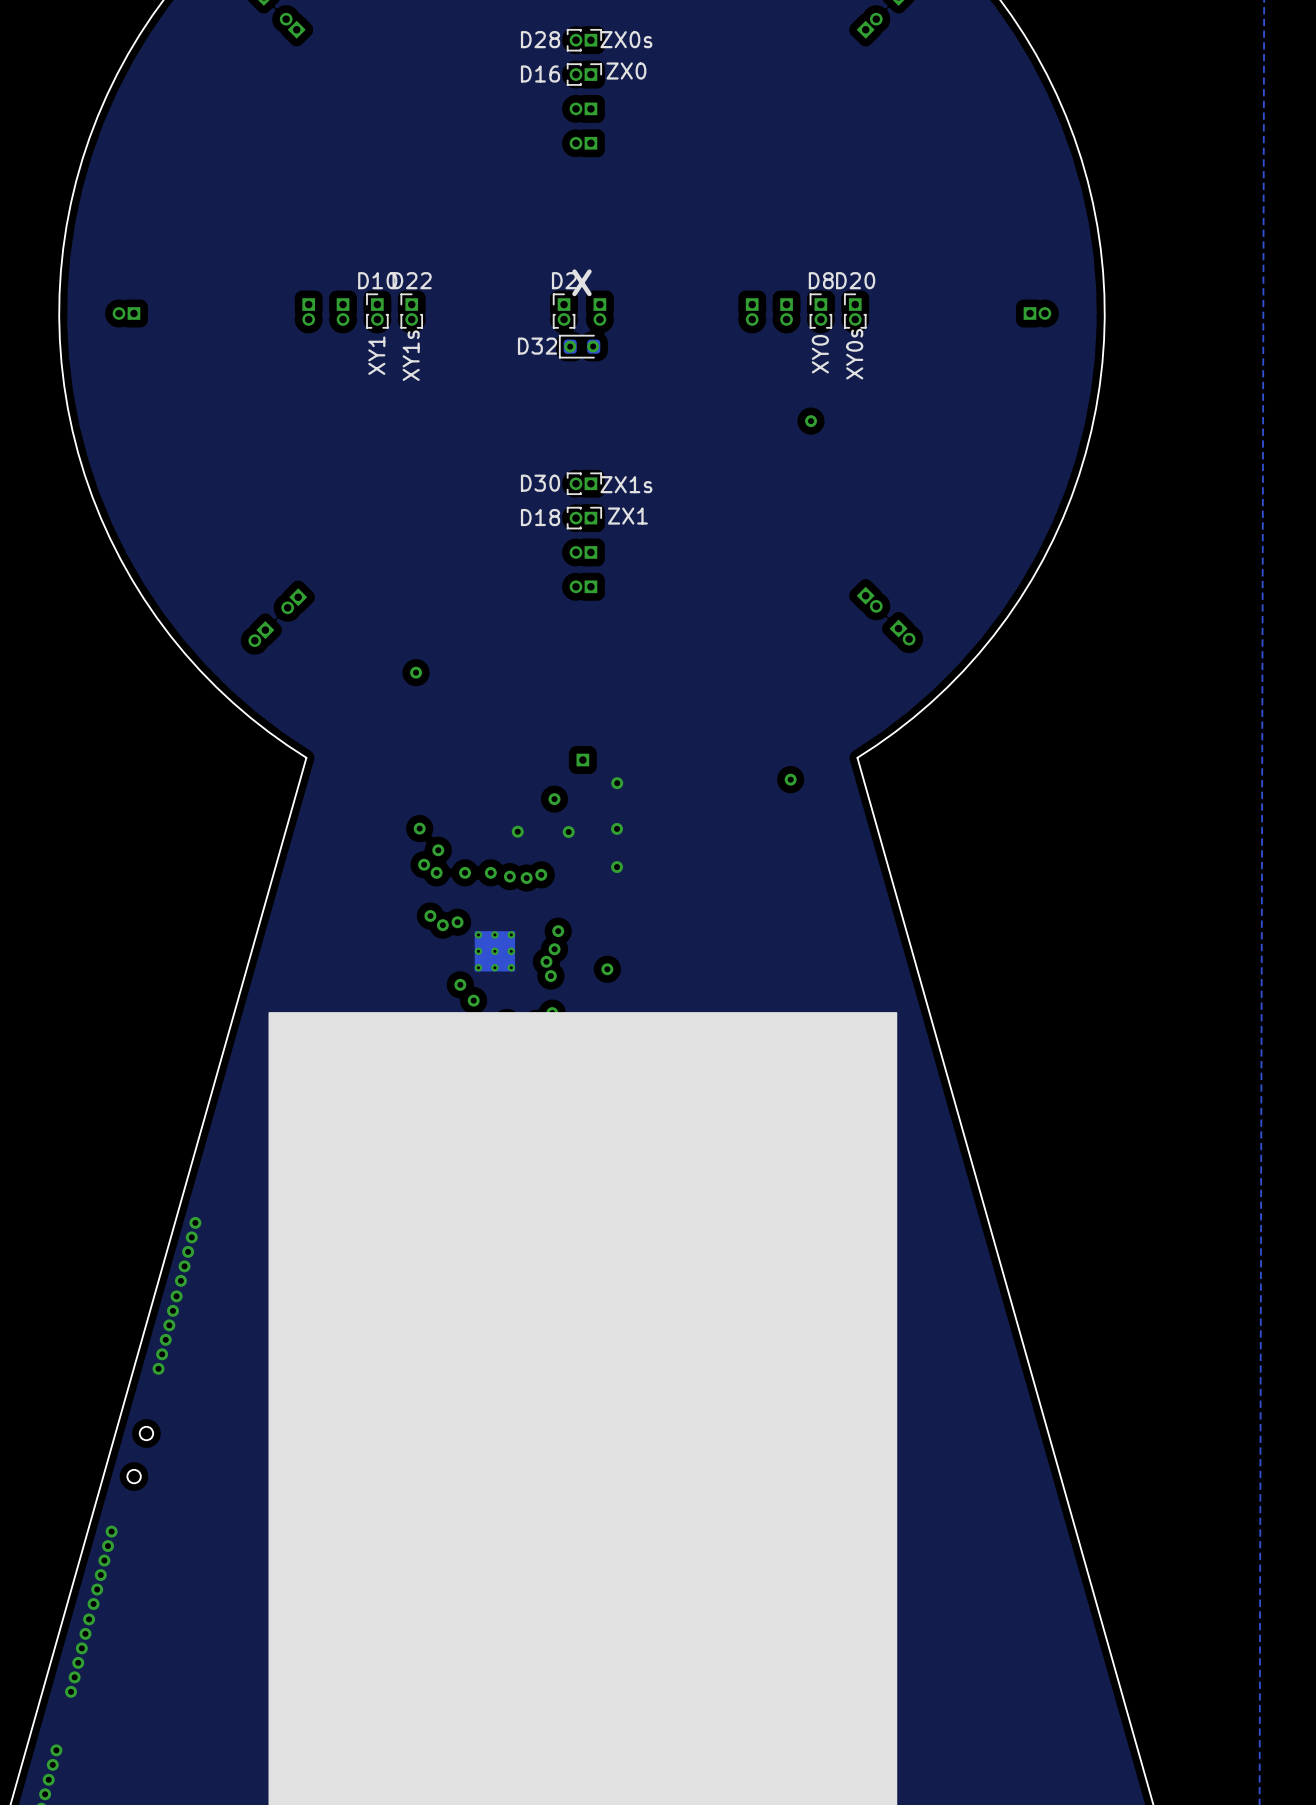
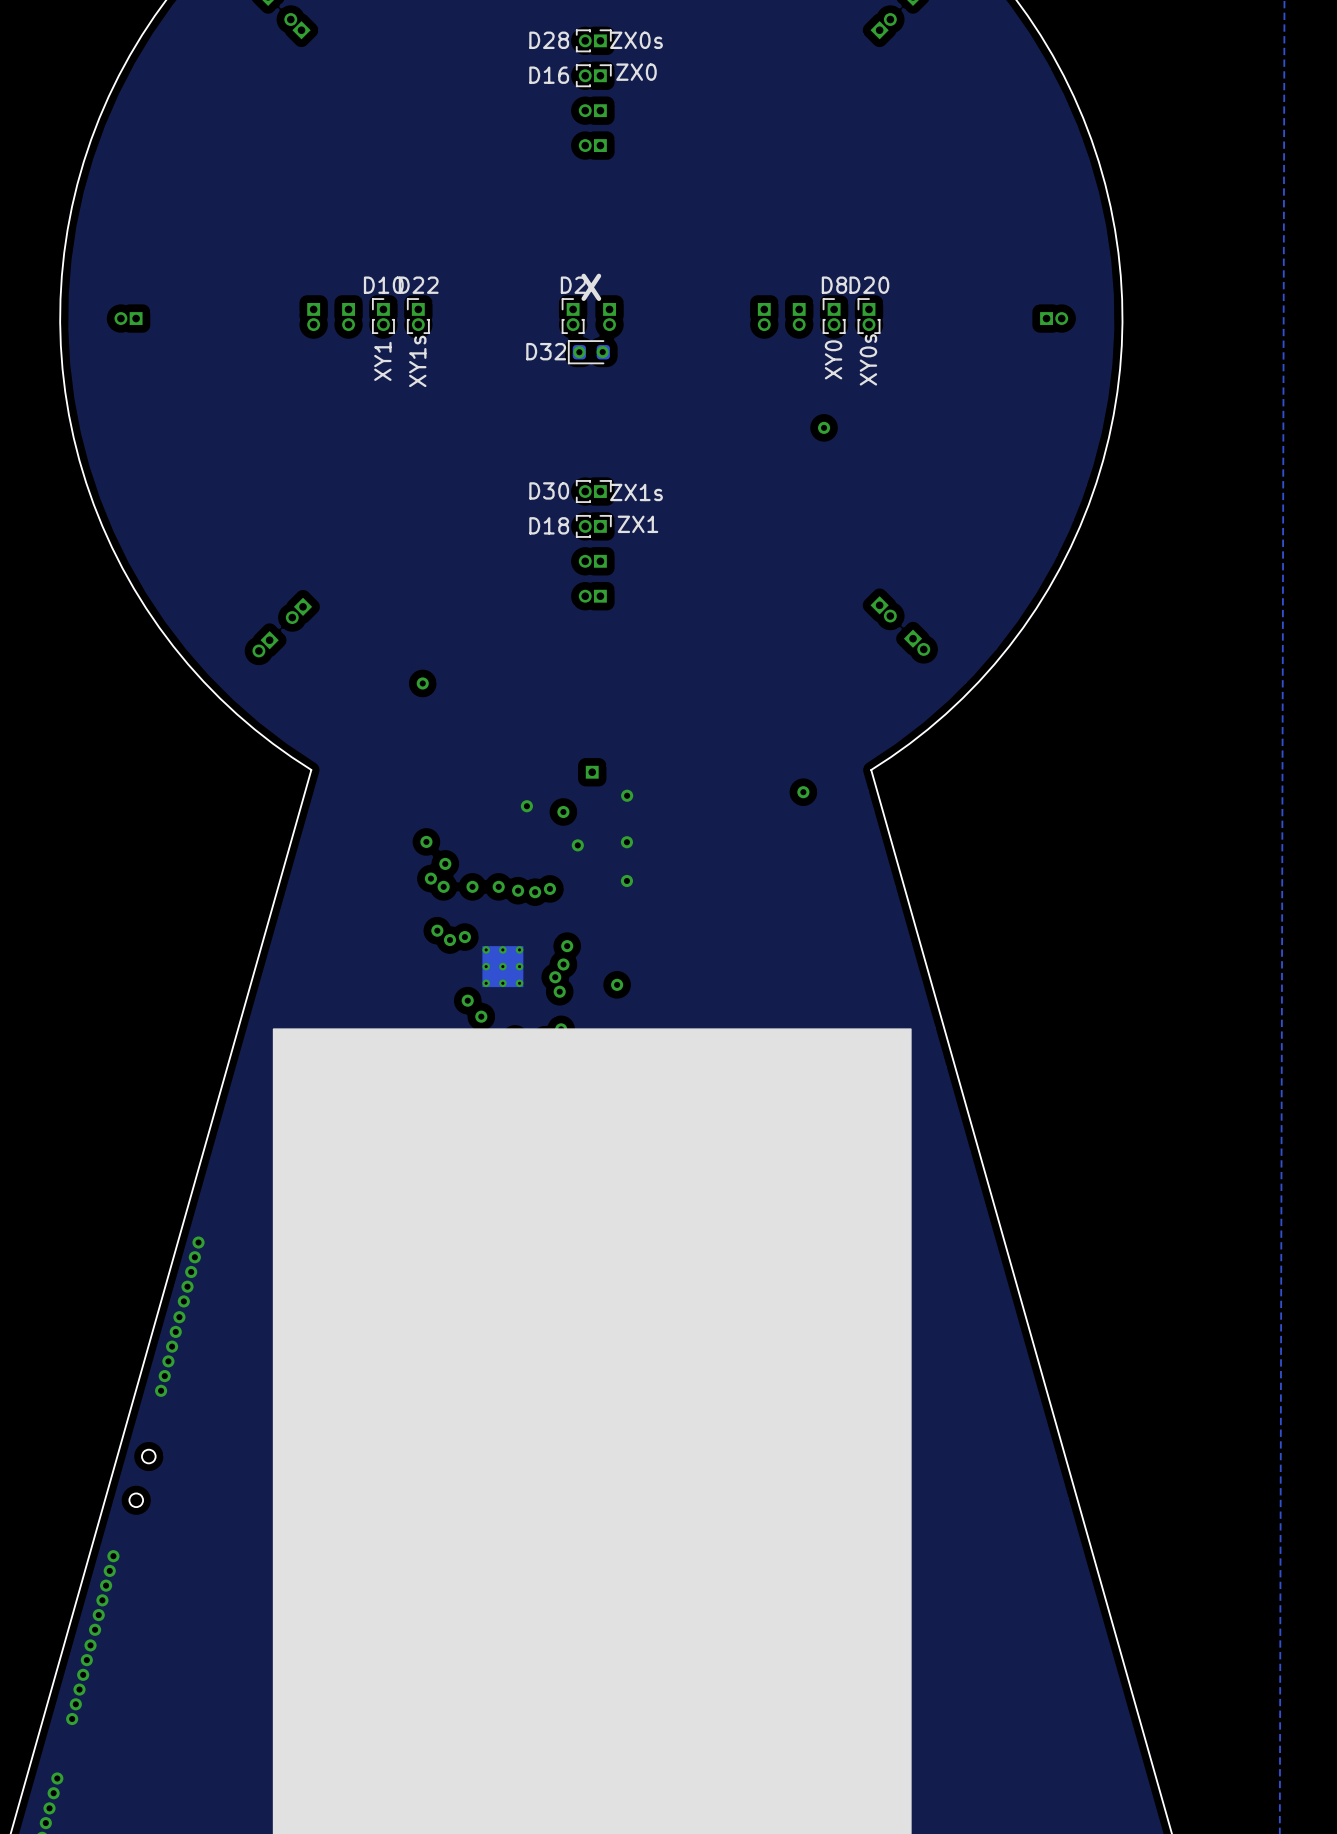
via position: (517, 831) -> (526, 806)

